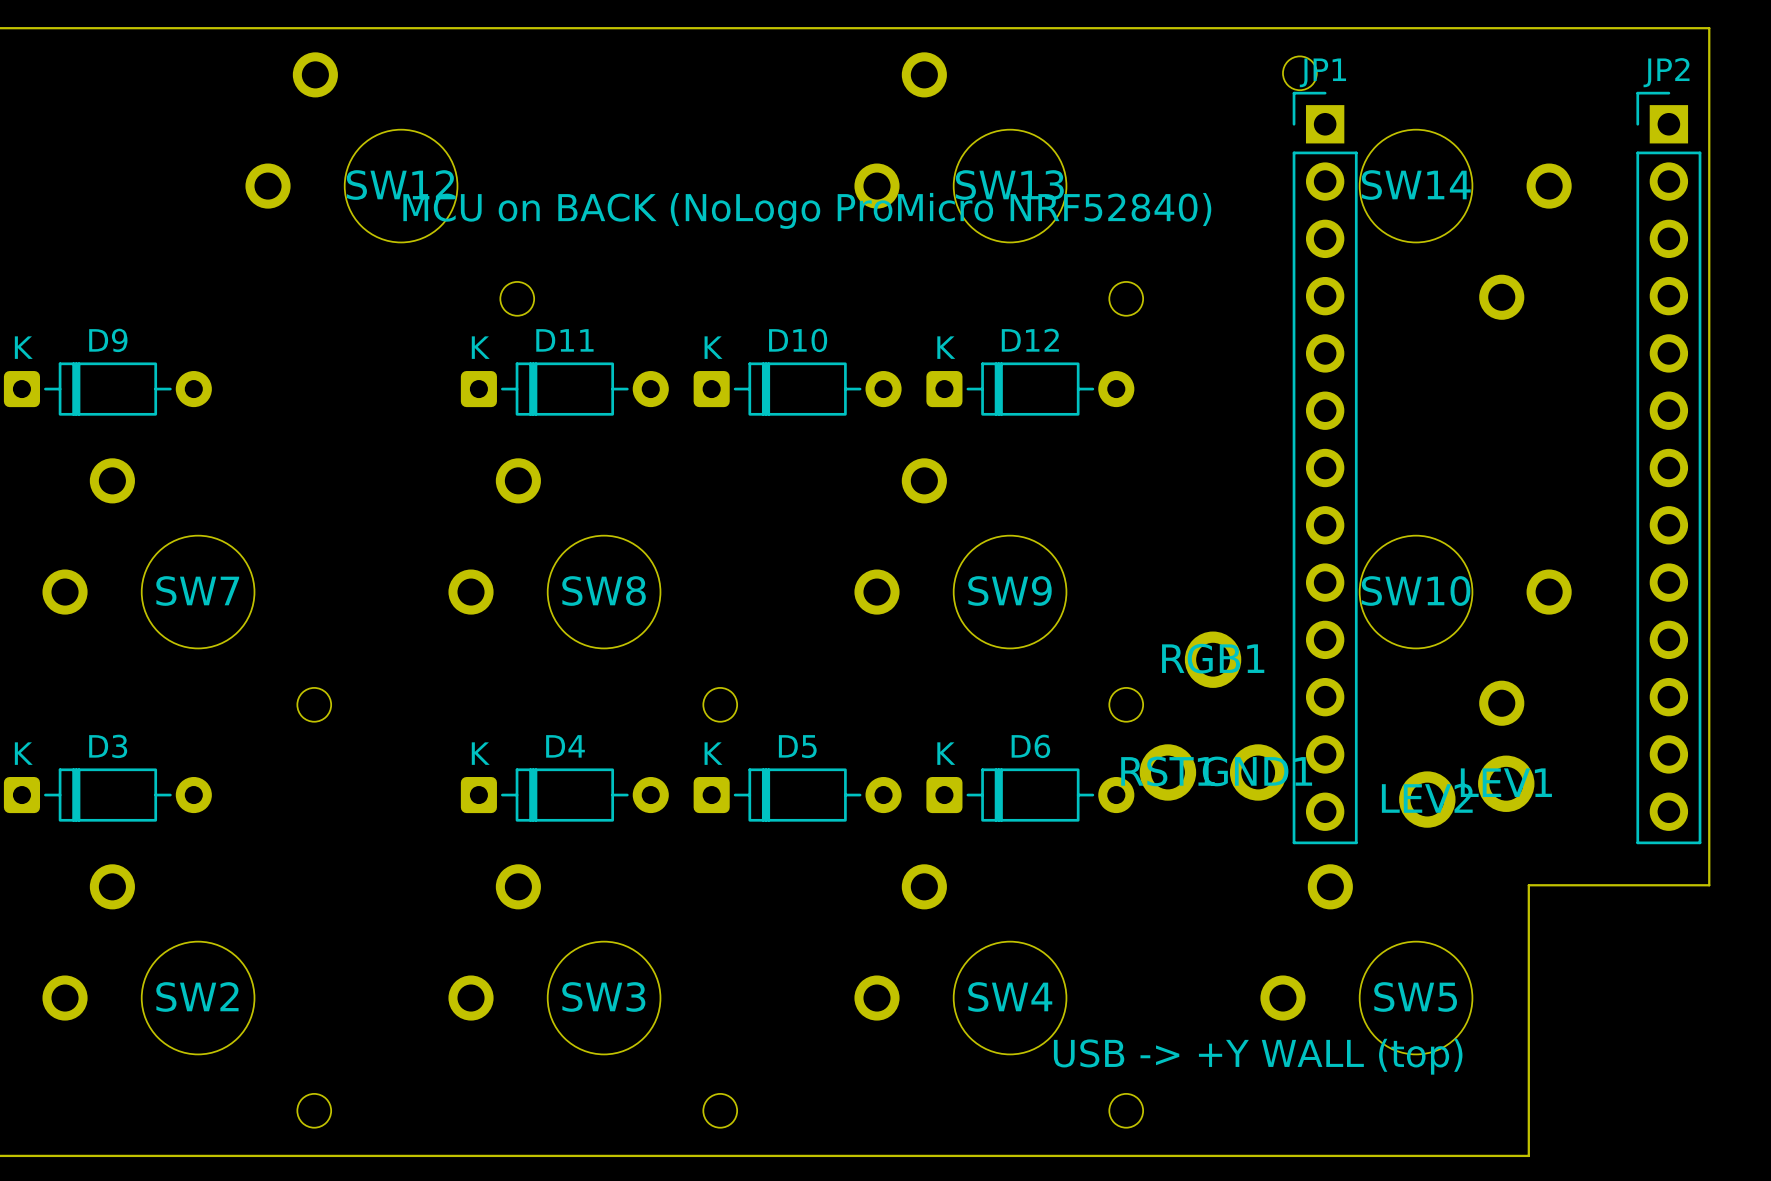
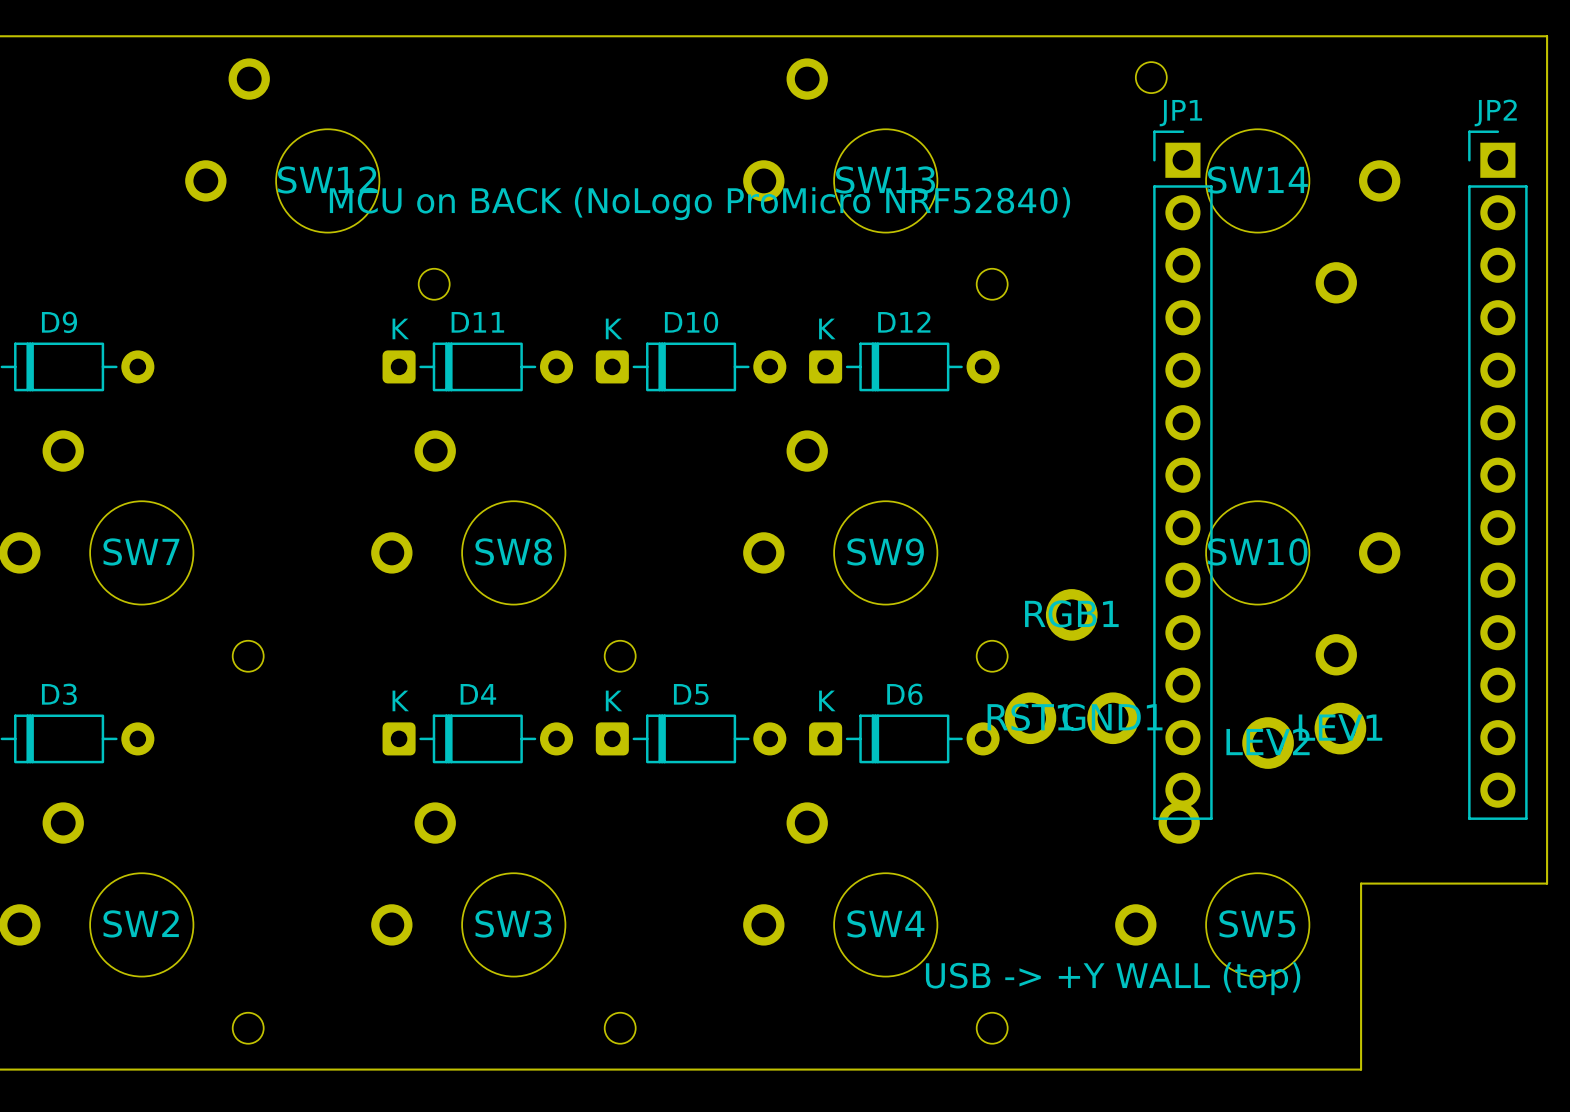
board edge: (1709, 28) (1709, 885) (1528, 885) (1528, 952) -> (1526, 36) (1547, 36) (1547, 883) (1361, 883)
JP1 position: (1325, 468) -> (1182, 475)
JP2 position: (1668, 468) -> (1497, 475)

